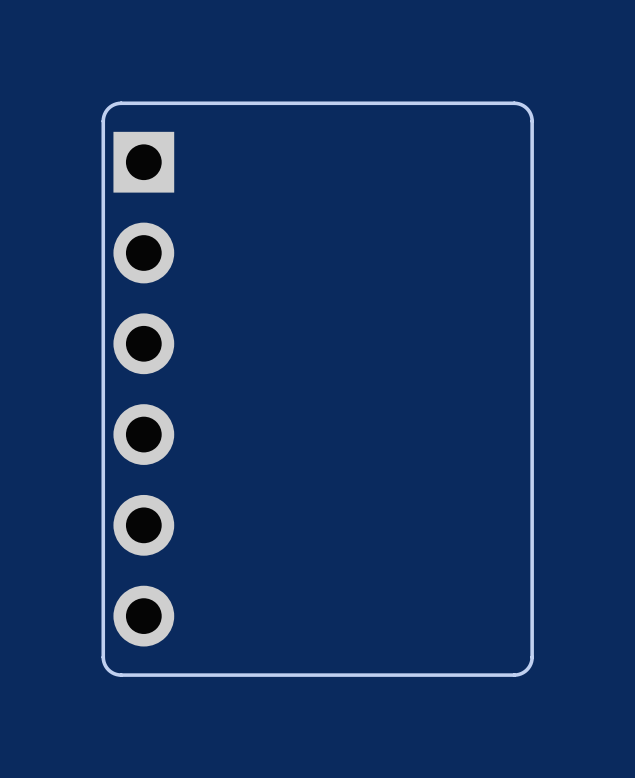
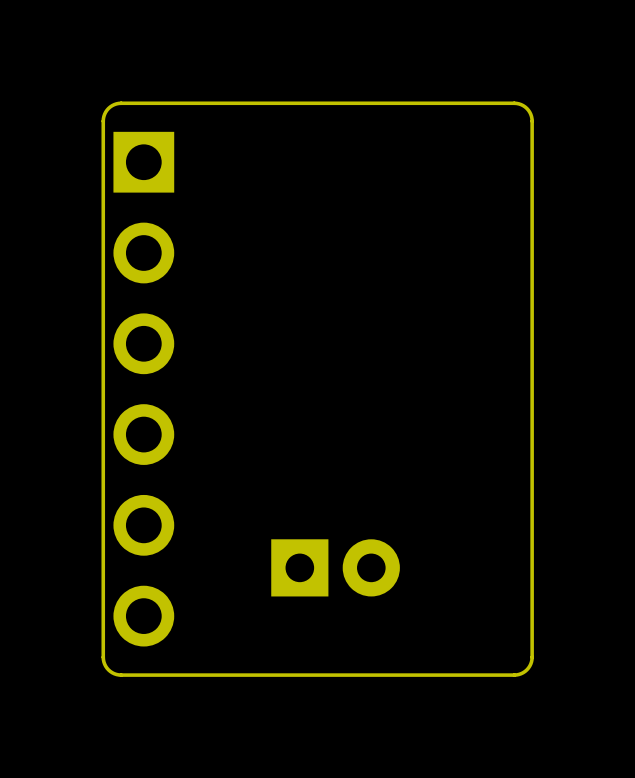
part: none -> (335, 567)

